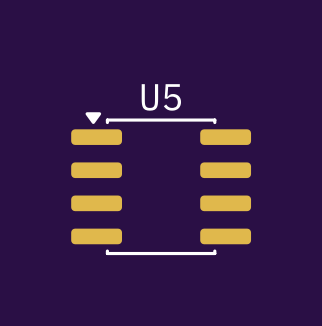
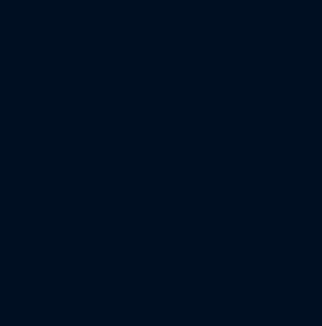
U5: (161, 183) -> none

